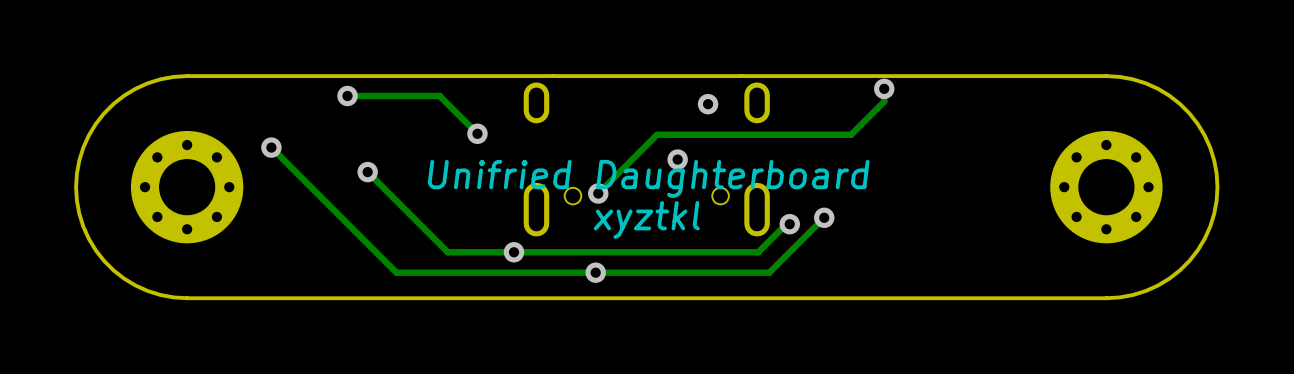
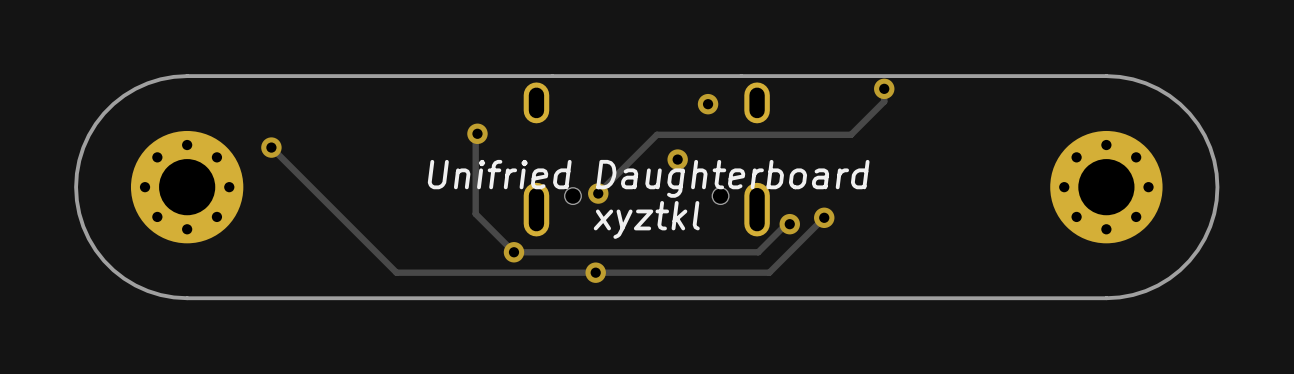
track: (347, 95) (439, 95) (477, 133) -> none
via: (347, 95) -> none
track: (367, 172) (447, 252) (513, 252) -> (475, 137) (475, 213) (513, 252)
via: (367, 172) -> none

